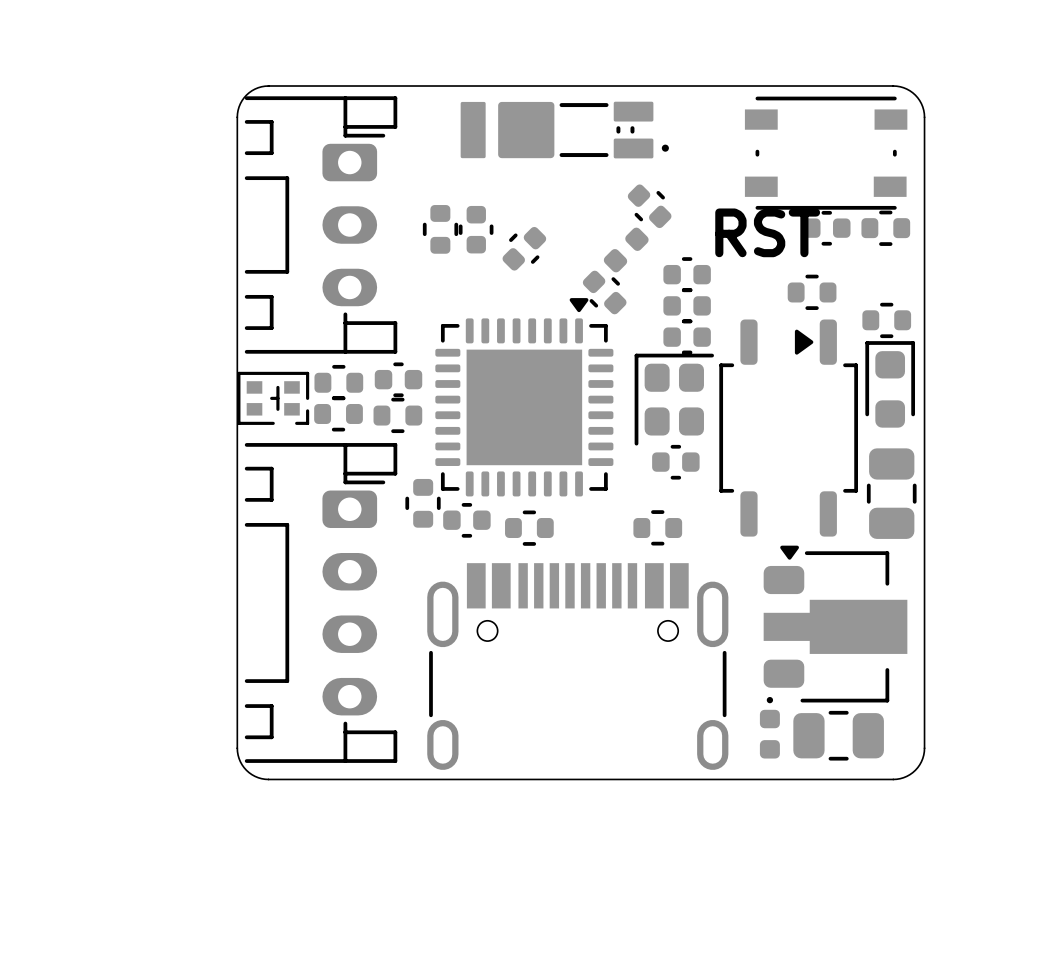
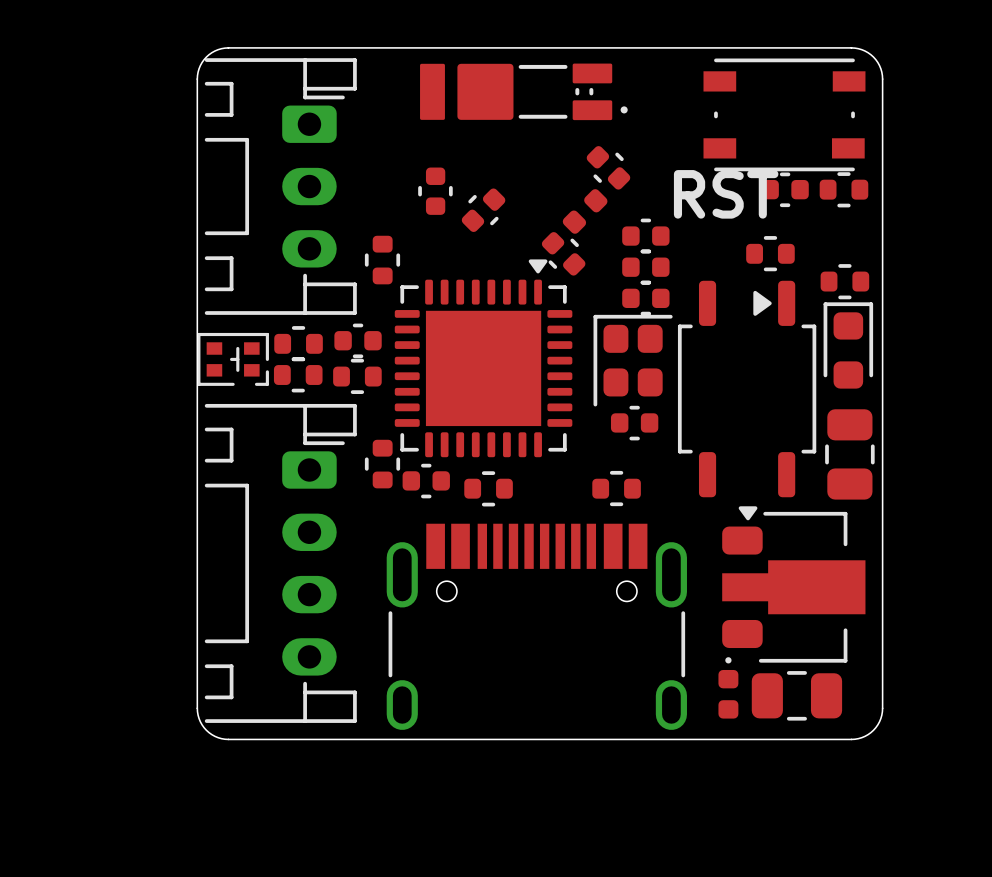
part position: (440, 229) -> (382, 260)

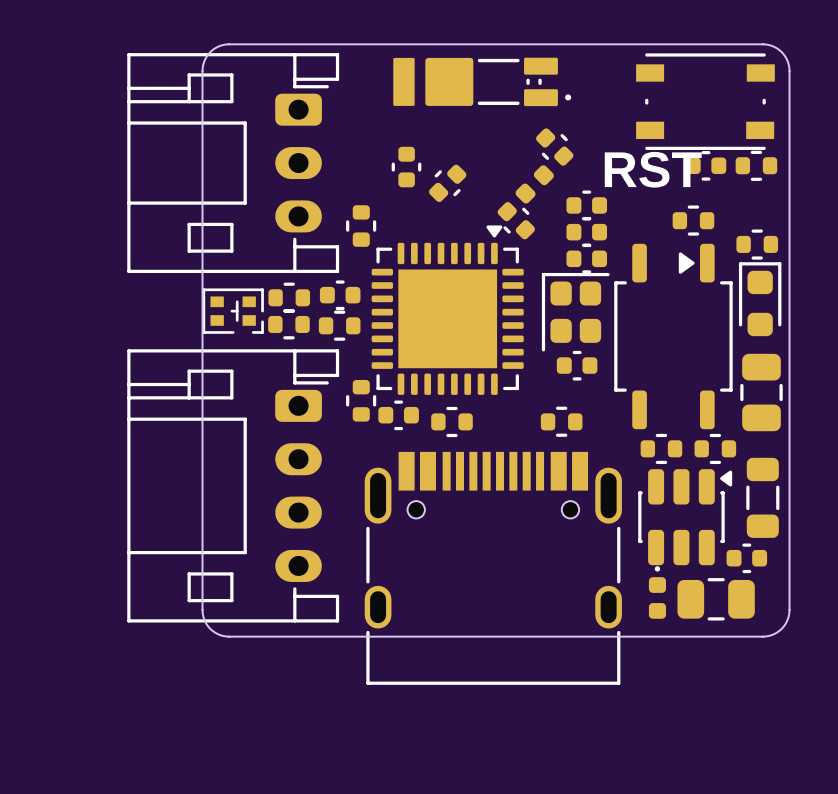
part: none -> (233, 163)
part: (280, 186) -> none
part: none -> (661, 448)
part: none -> (715, 448)
part: none -> (233, 485)
part: (280, 563) -> none
part: none -> (762, 497)
part: (793, 584) -> none
part: none -> (685, 517)
part: none -> (746, 558)
part: none -> (493, 568)

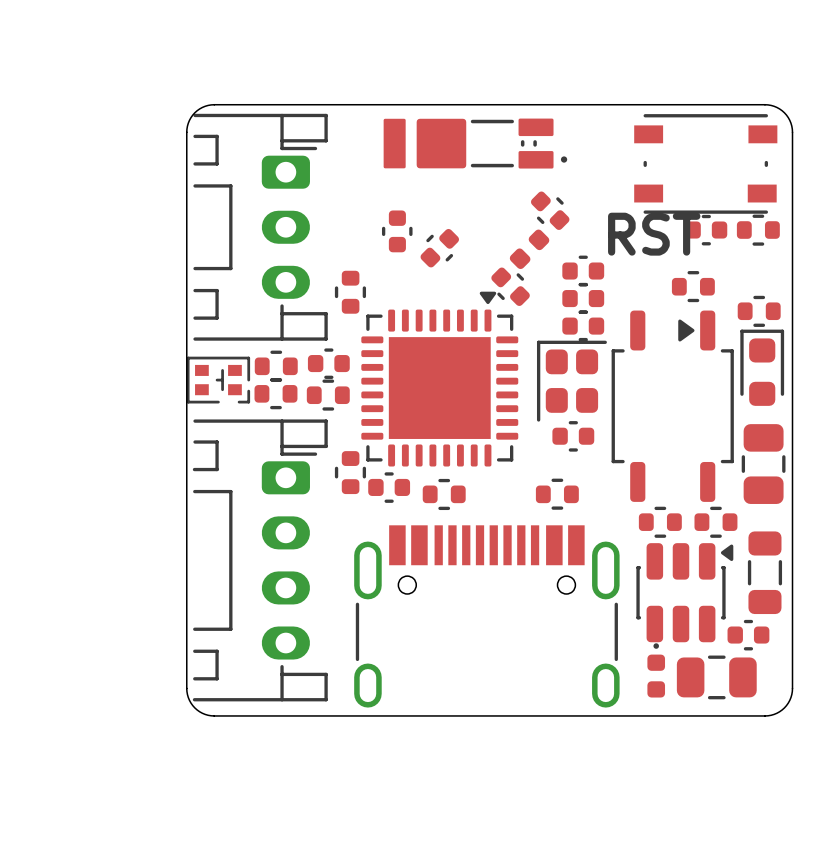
part: (233, 163) -> none
part: none -> (260, 227)
part: (233, 485) -> none
part: none -> (260, 560)
part: (493, 568) -> none

